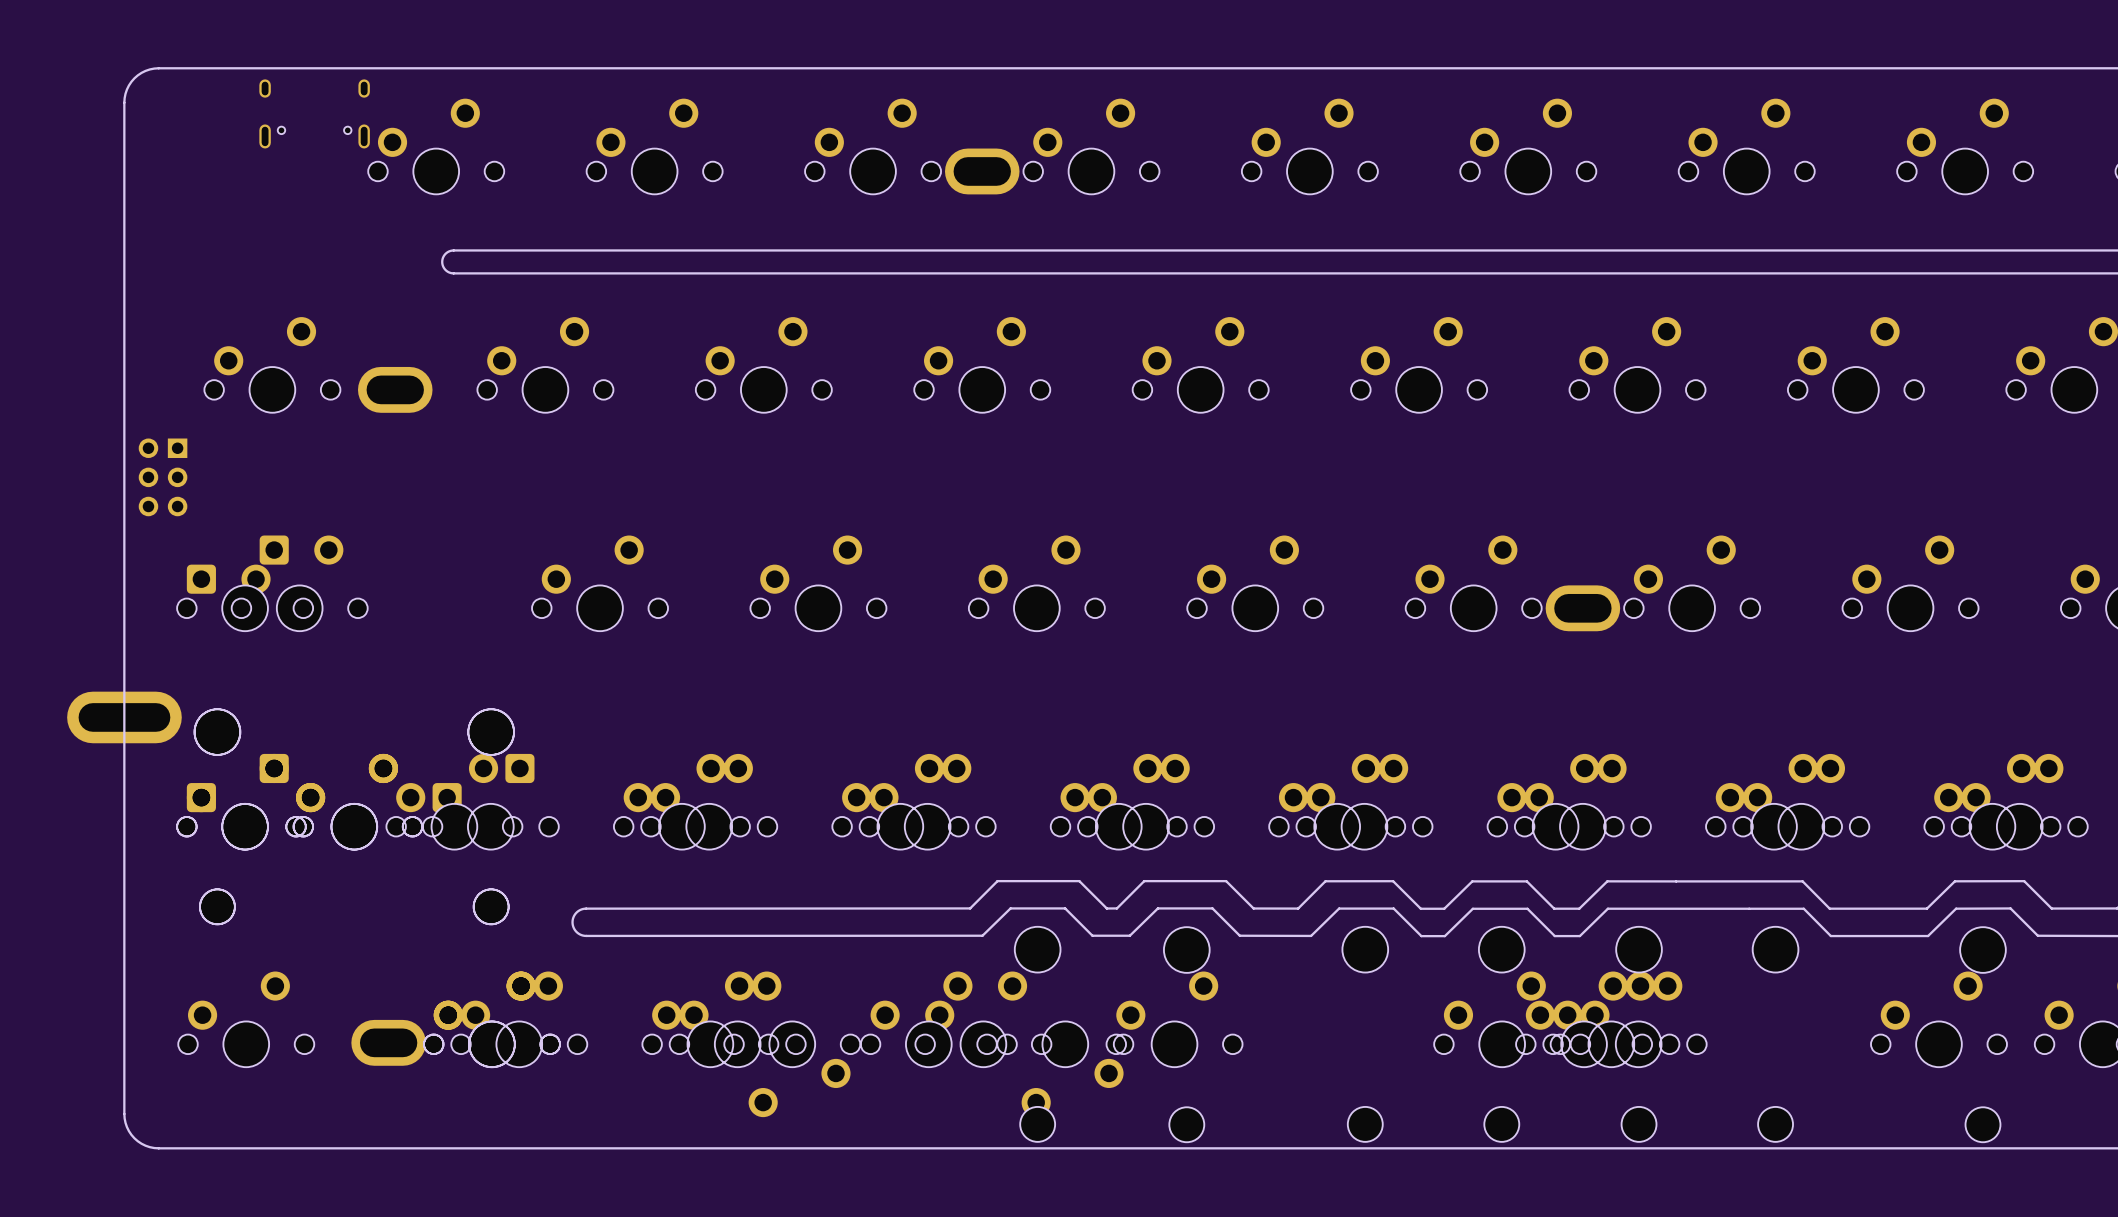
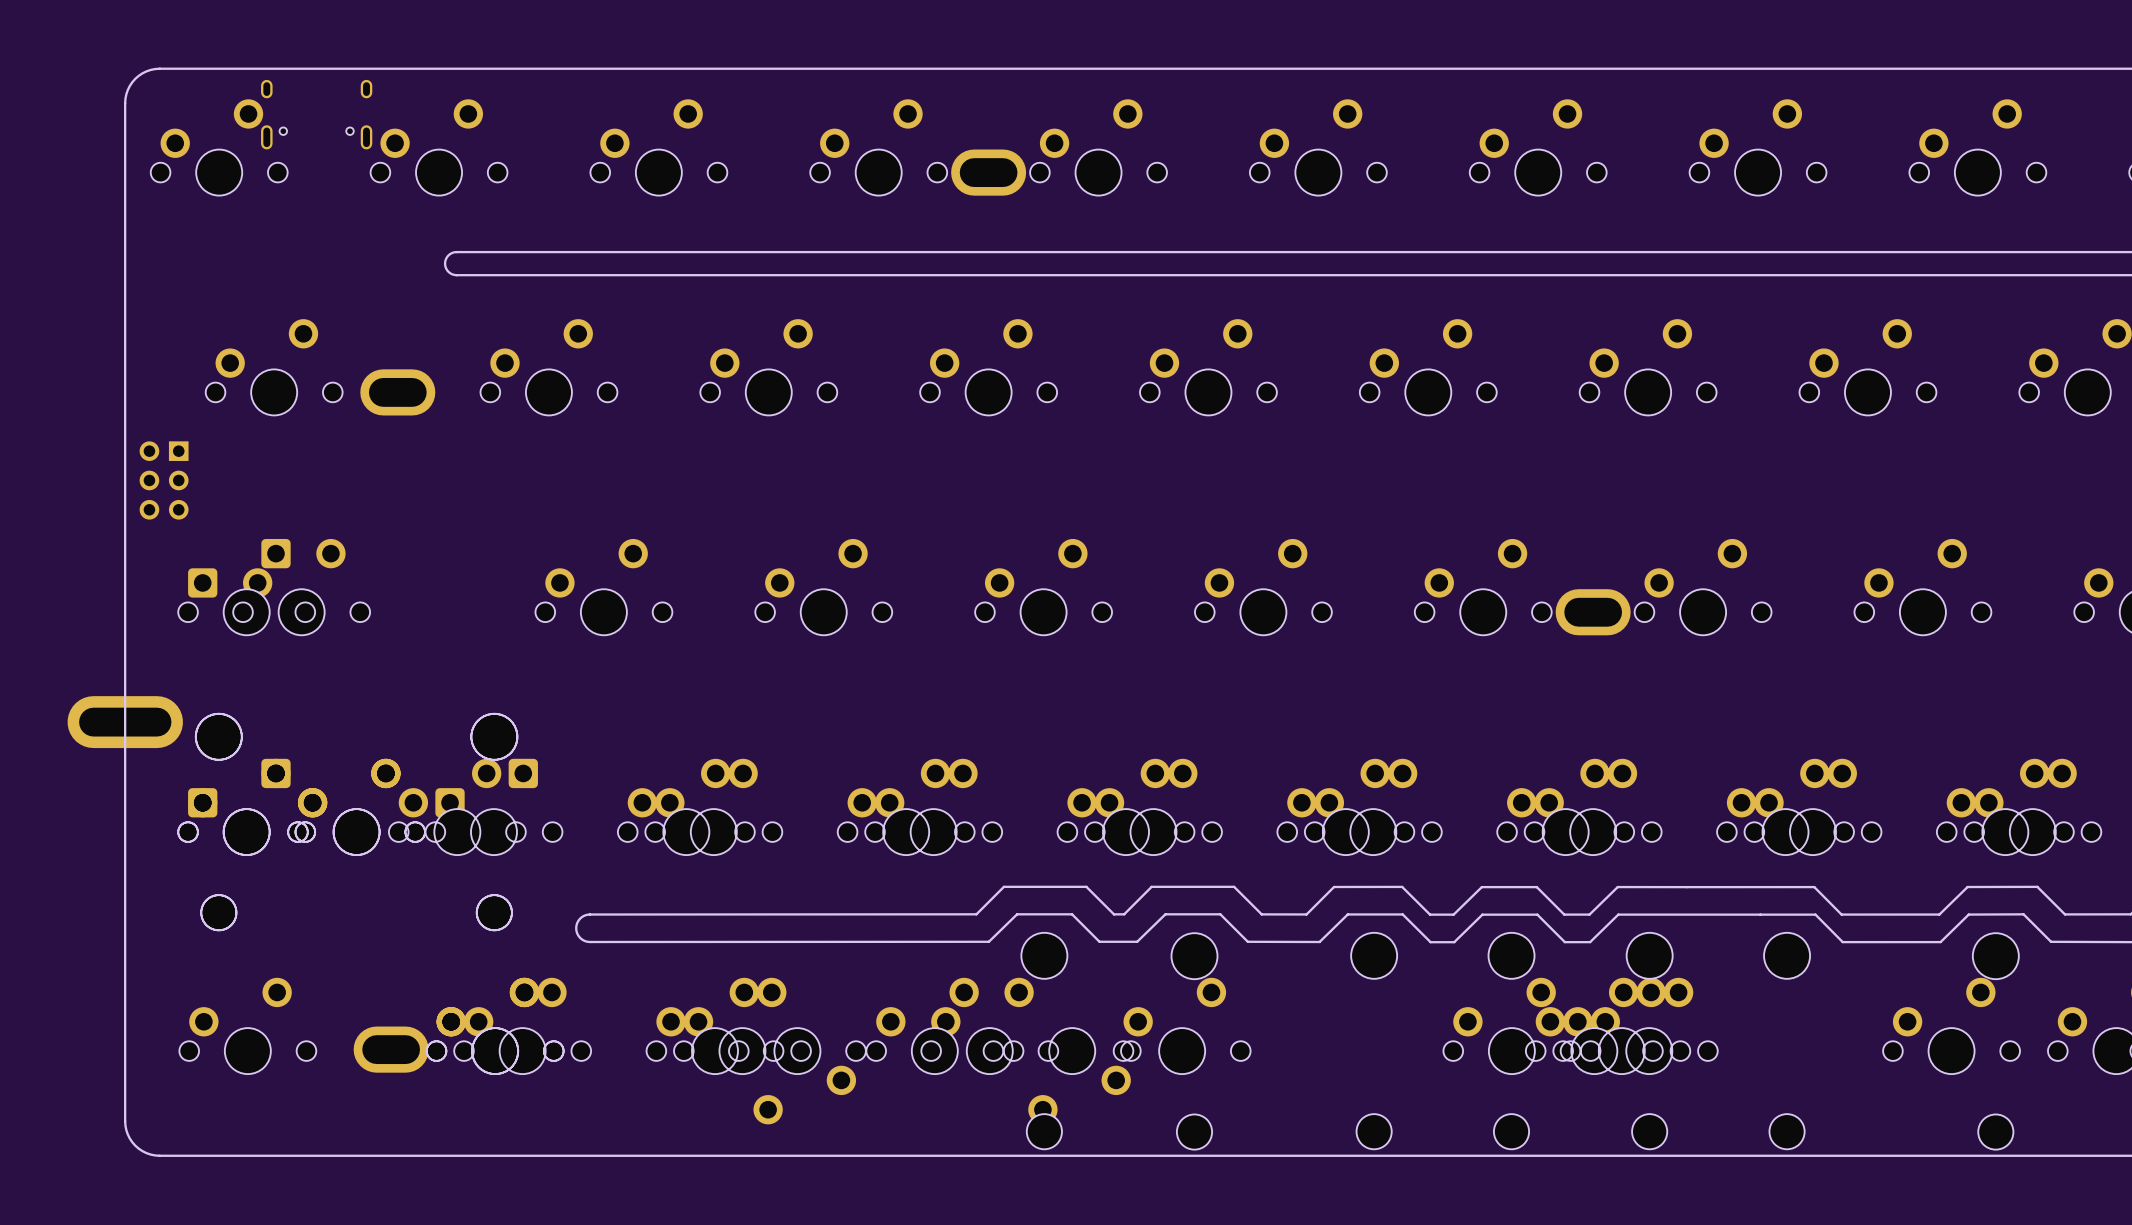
part: none -> (219, 147)

